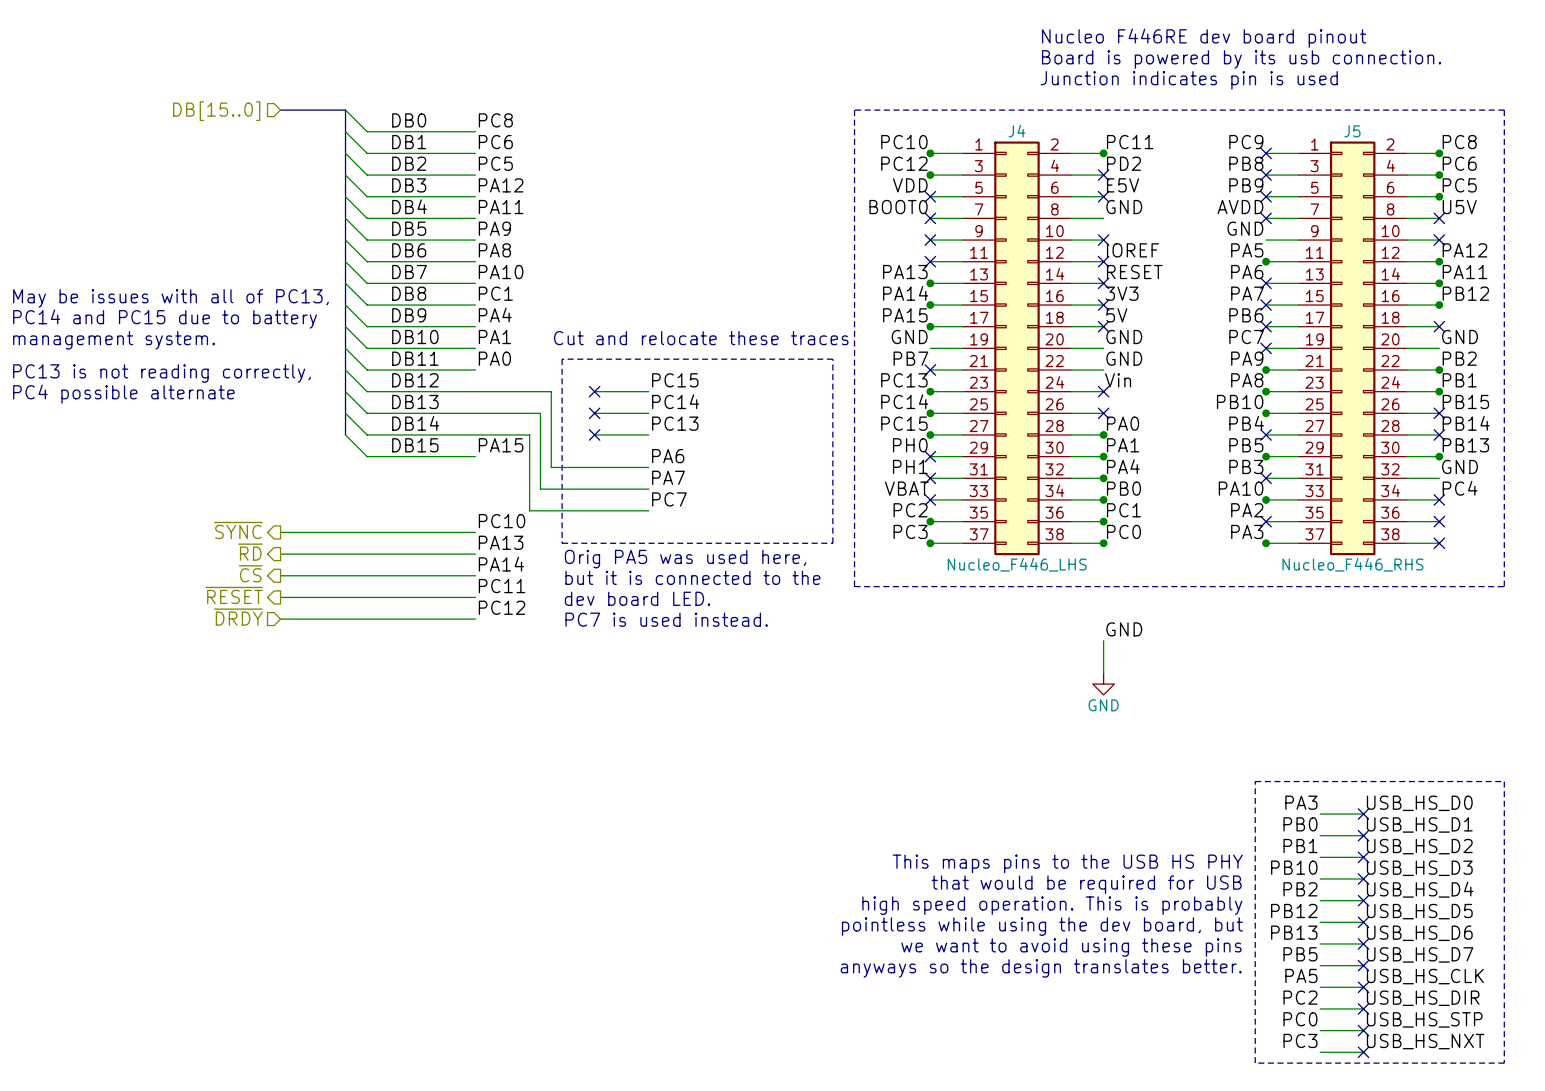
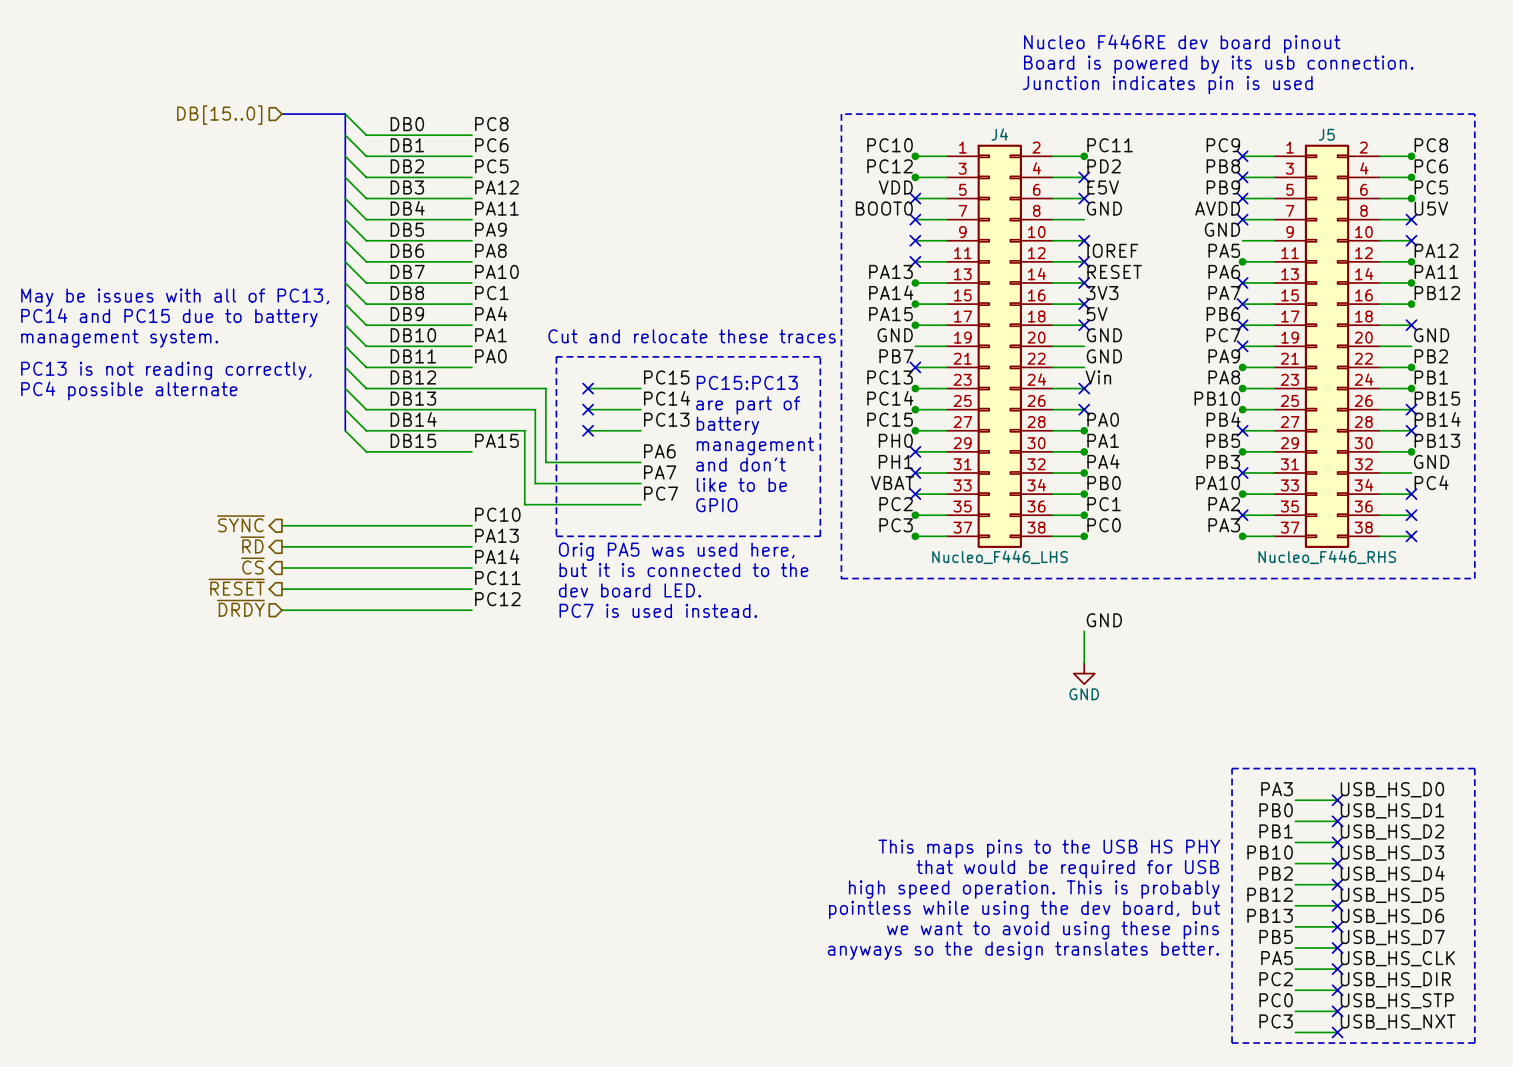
text: none -> PC15:PC13 (747, 382)
text: none -> are part of (748, 405)
text: none -> battery (727, 425)
text: none -> management (755, 446)
text: none -> and don't (740, 464)
text: none -> like to be (741, 484)
text: none -> GPIO (716, 505)

